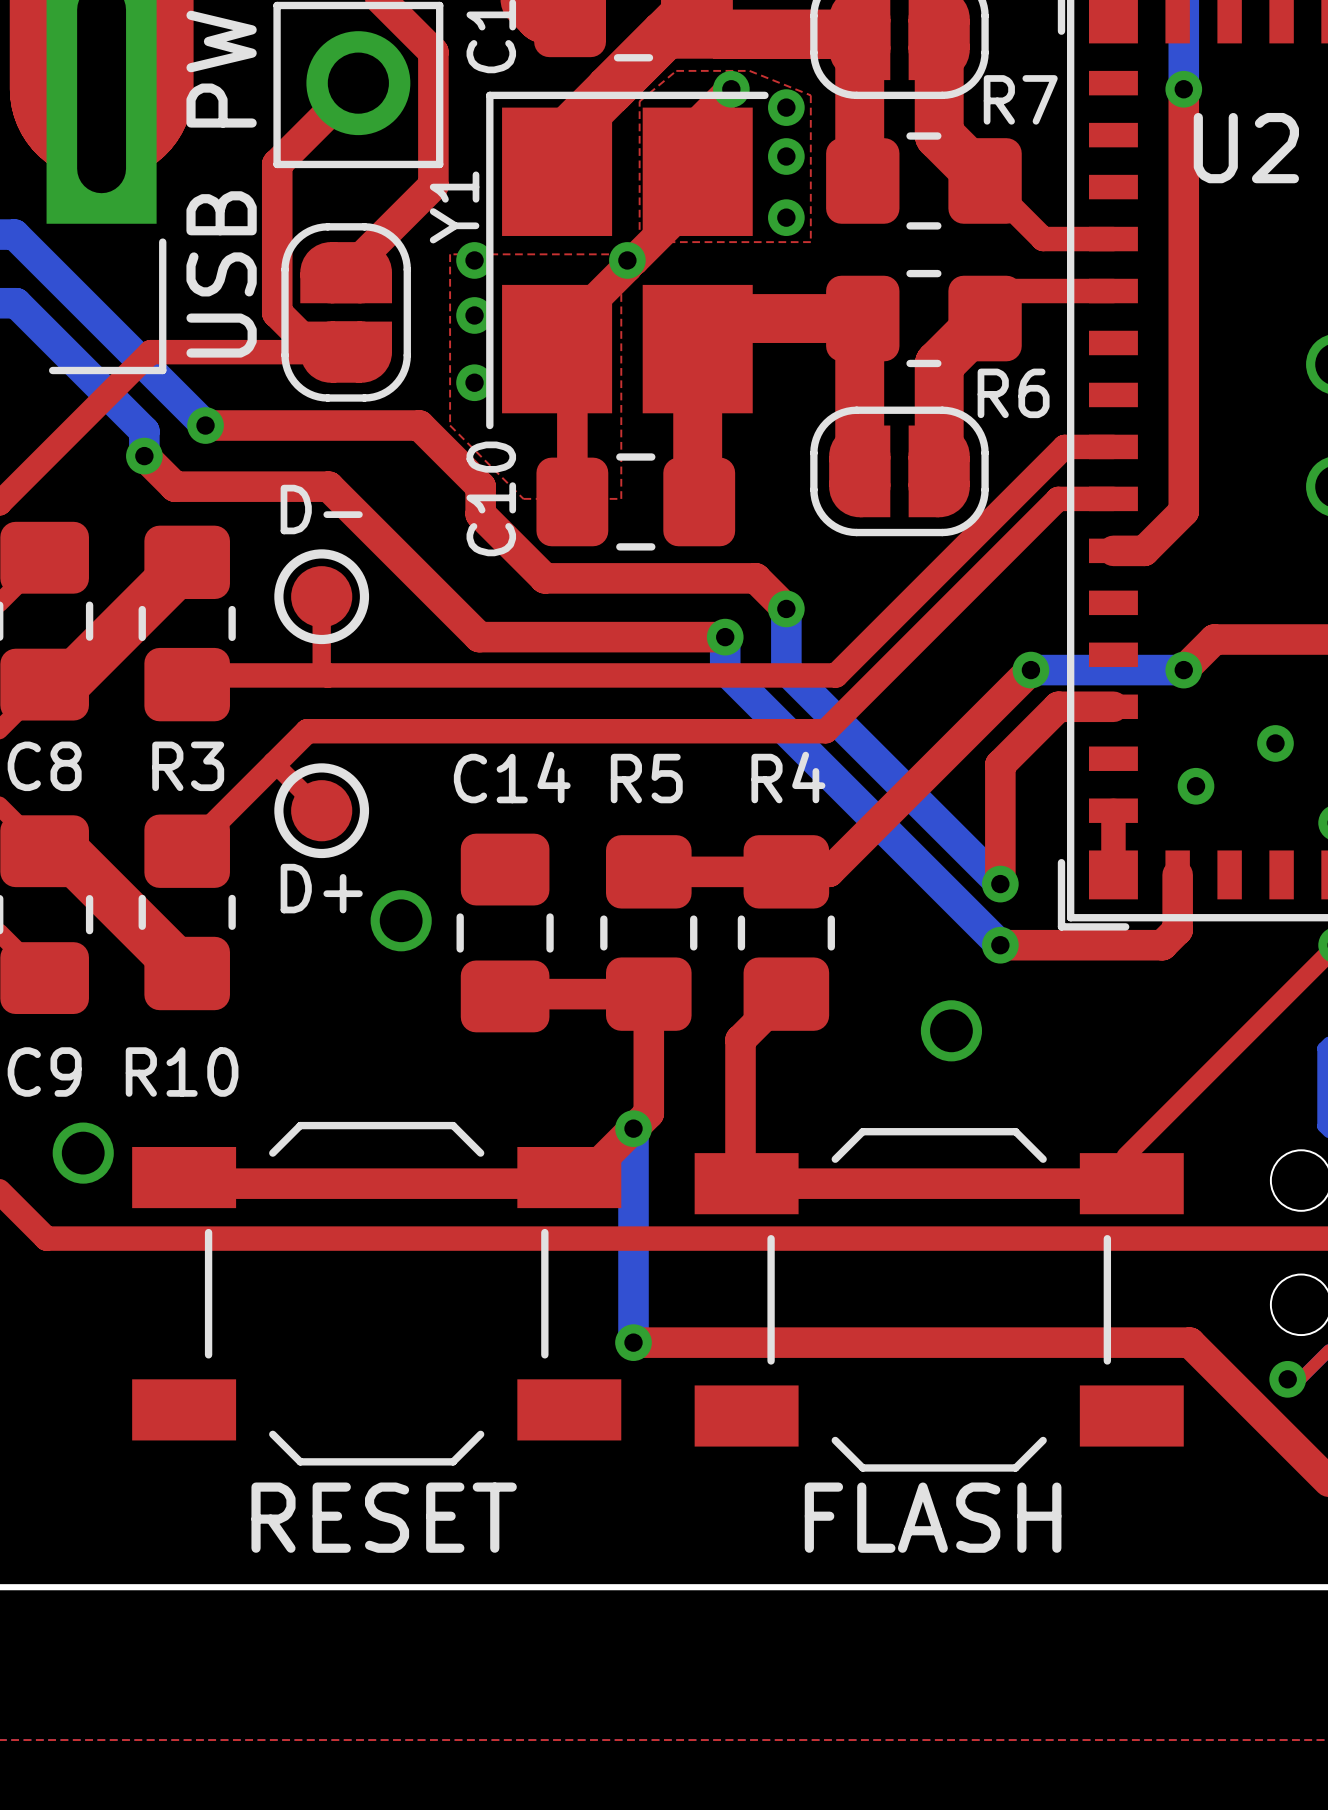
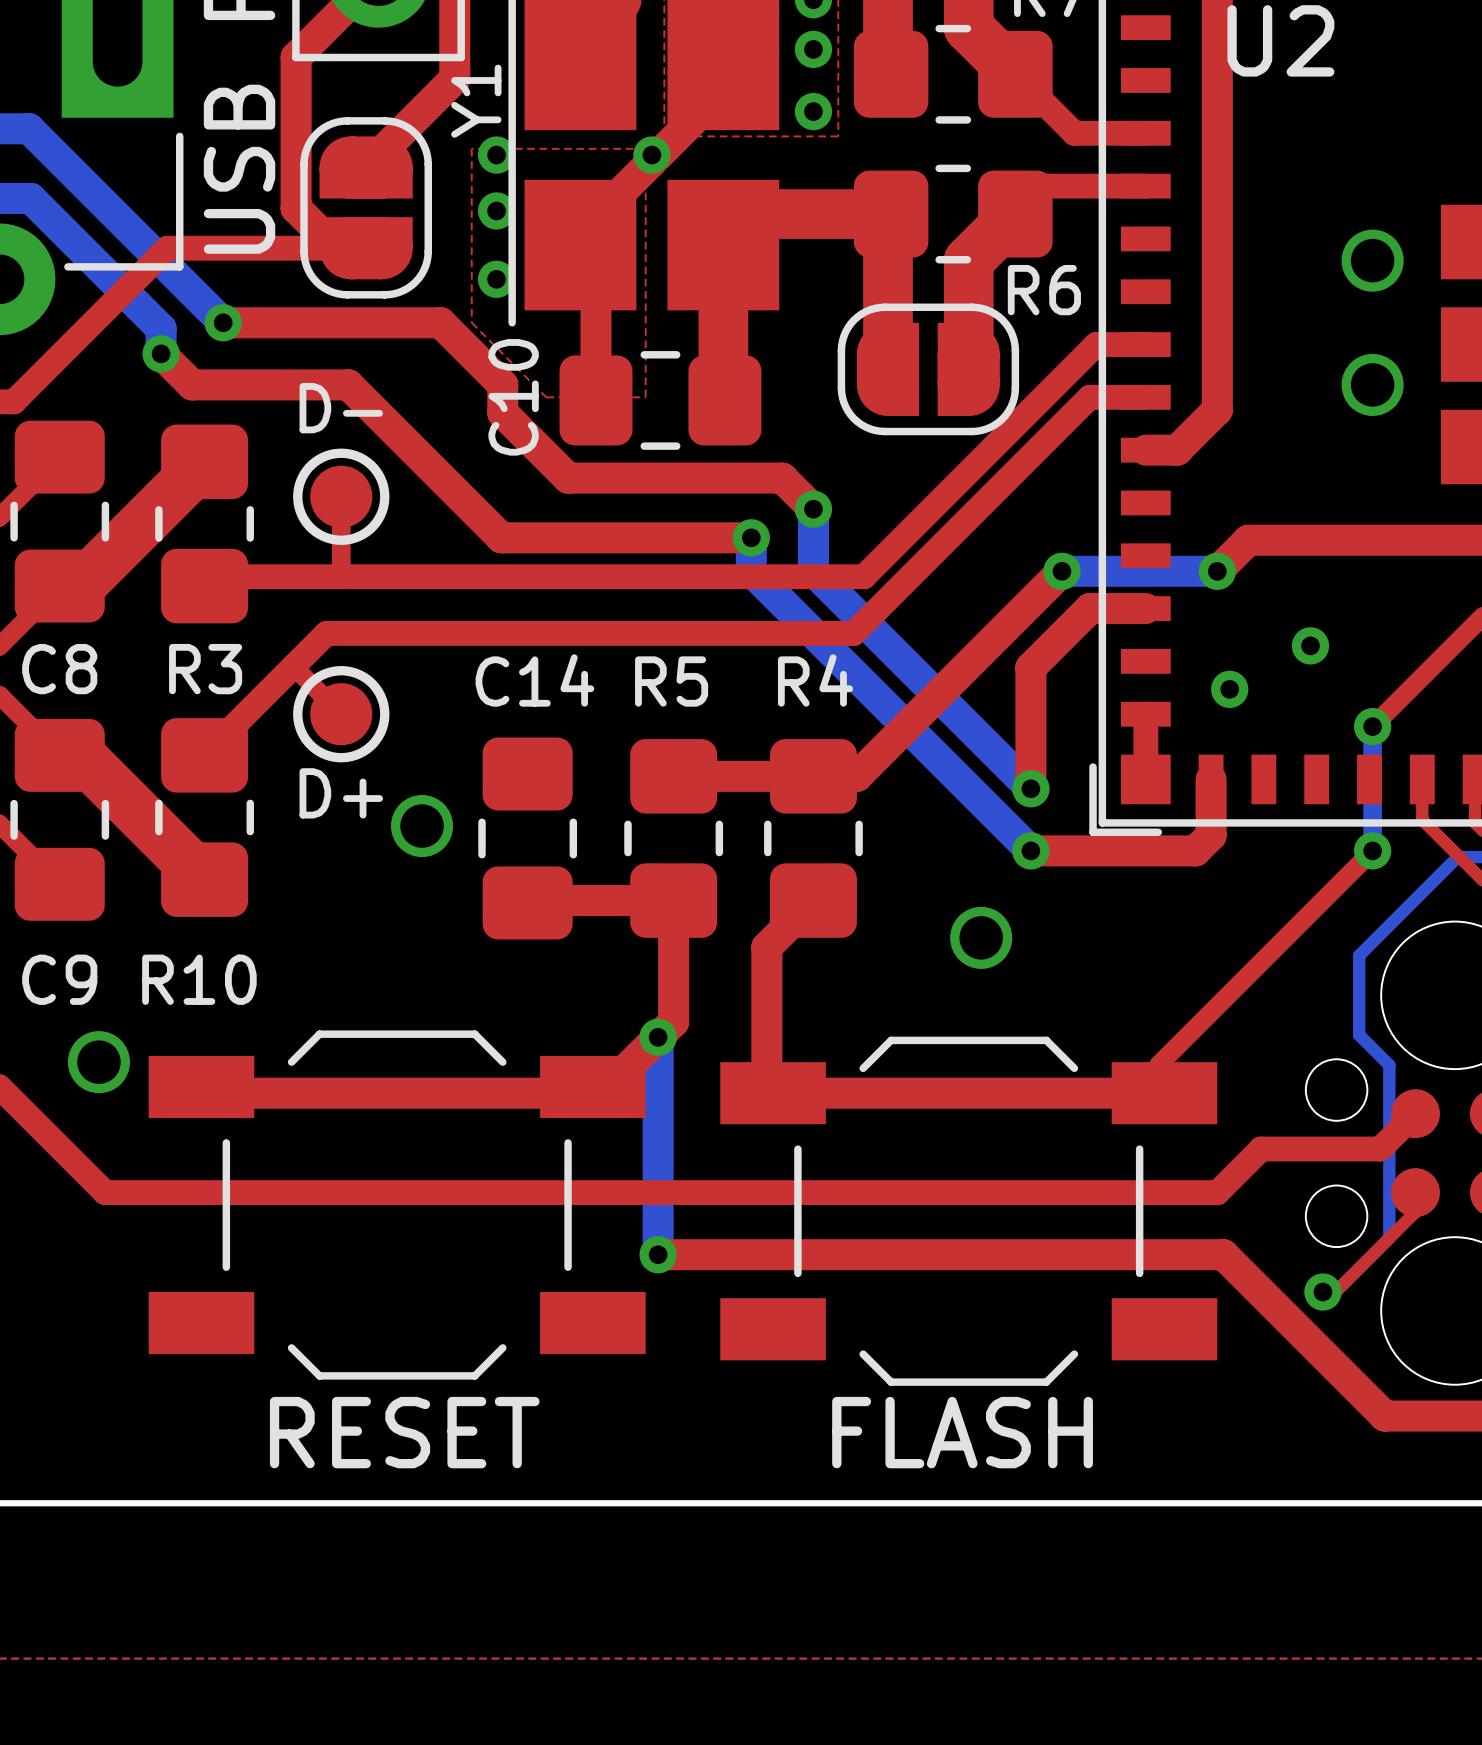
top track: (46, 1238) (1226, 1238) -> (61, 1149) (105, 1192) (1217, 1192) (1261, 1149)

